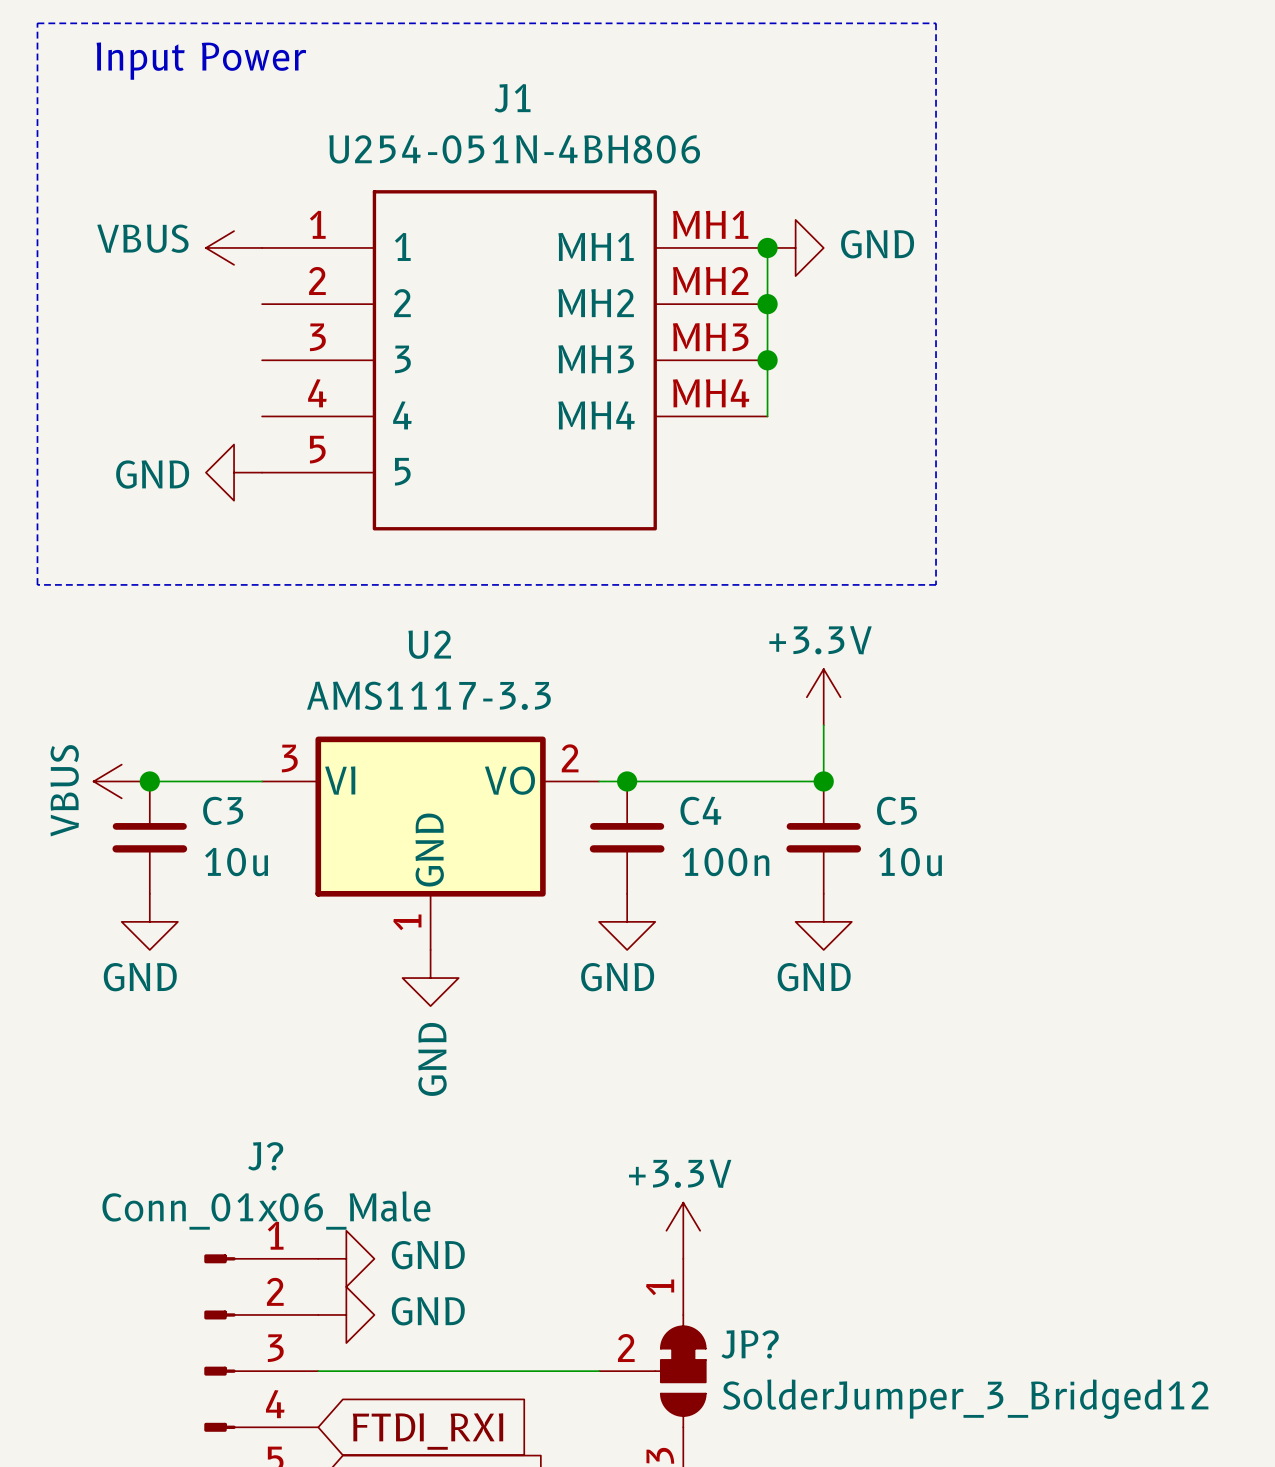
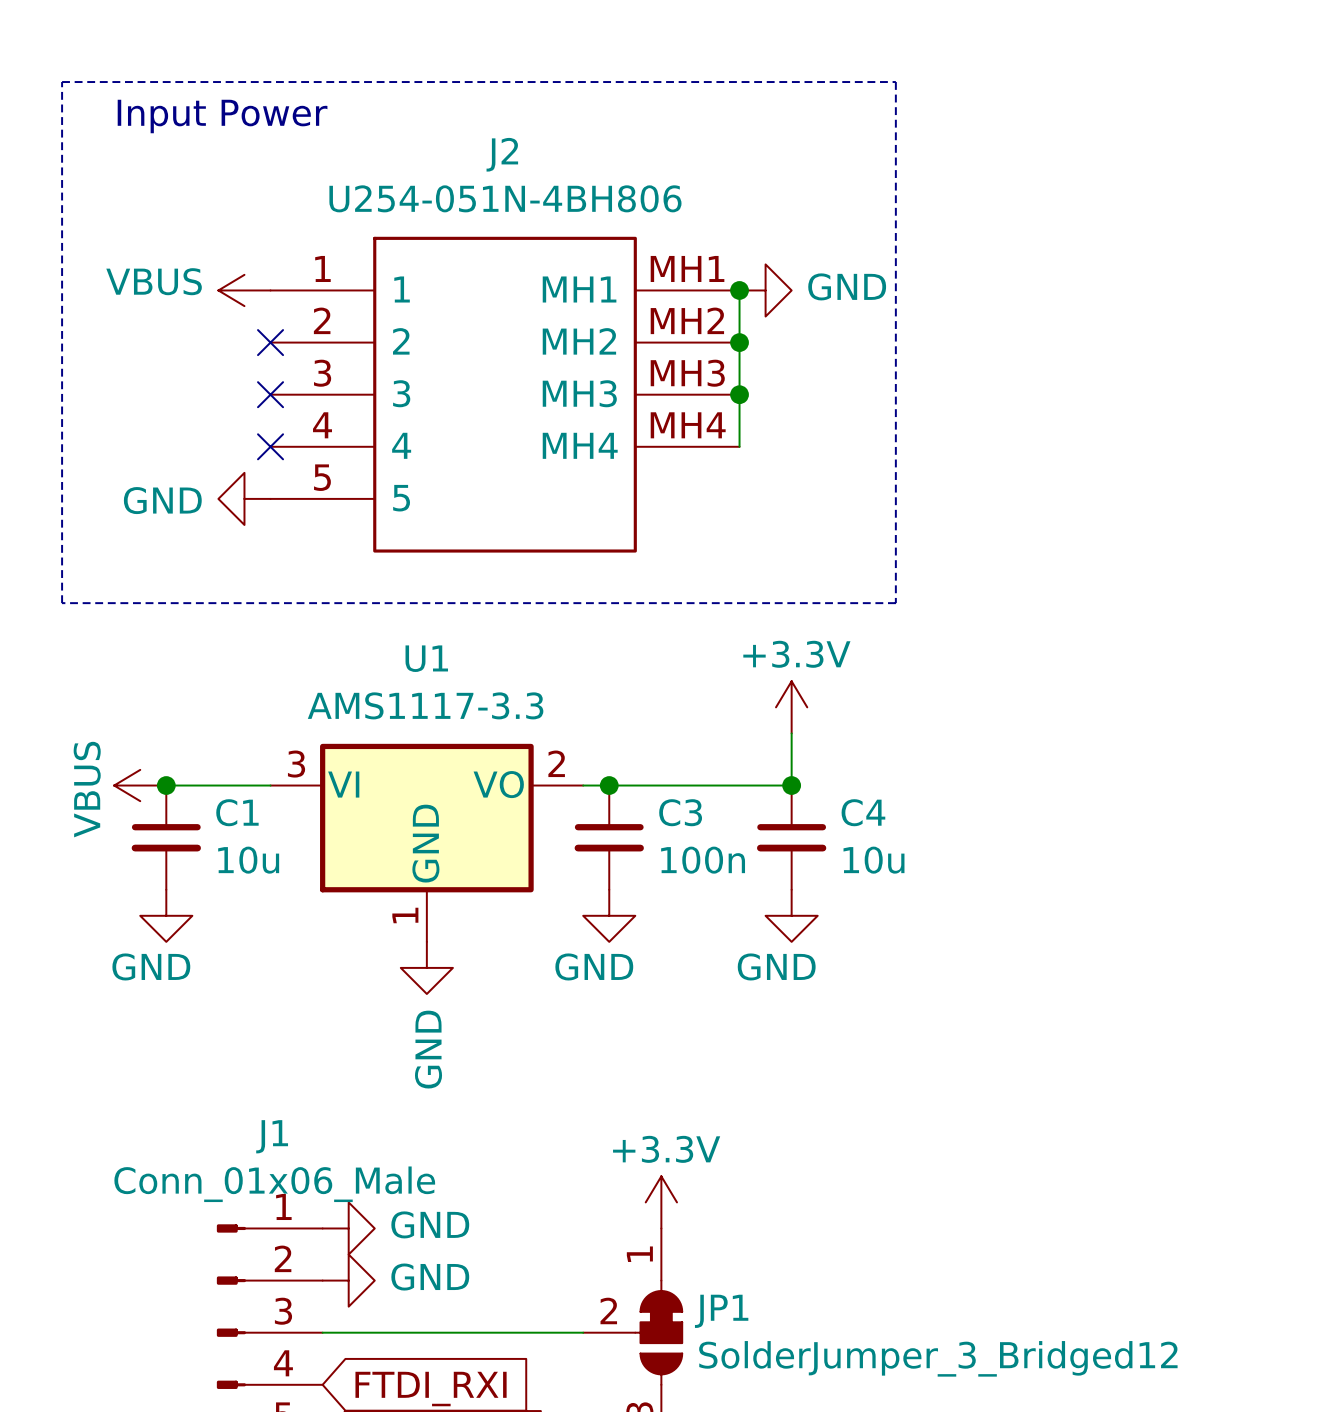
J1 name: J1 (512, 98) -> J2 (502, 154)
no-connect mark: none -> (270, 342)
no-connect mark: none -> (270, 394)
no-connect mark: none -> (270, 446)
U2 name: U2 (429, 644) -> U1 (426, 658)
C3 name: C3 (223, 810) -> C1 (237, 812)
C4 name: C4 (700, 810) -> C3 (680, 812)
C5 name: C5 (896, 810) -> C4 (863, 812)
J? name: J? (265, 1156) -> J1 (272, 1136)
JP? name: JP? (750, 1344) -> JP1 (721, 1311)

